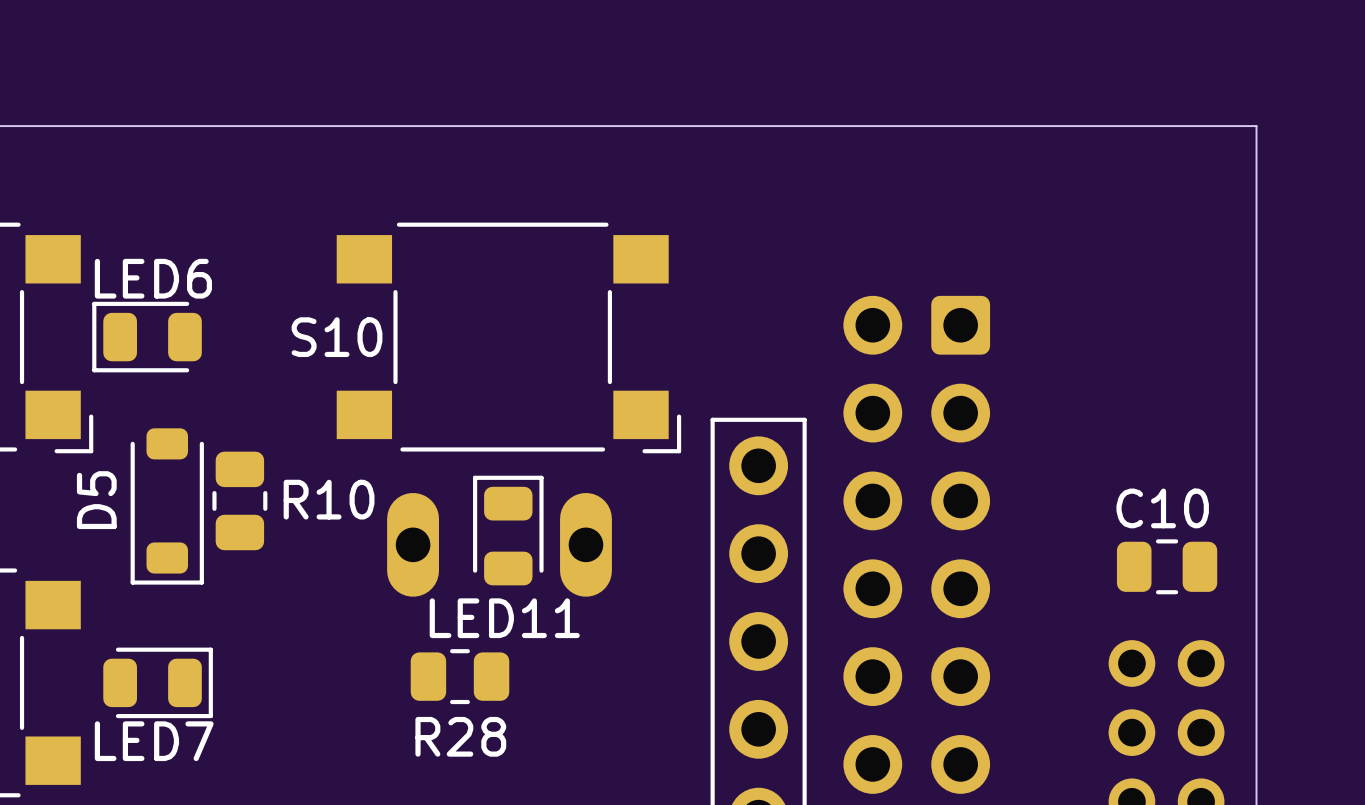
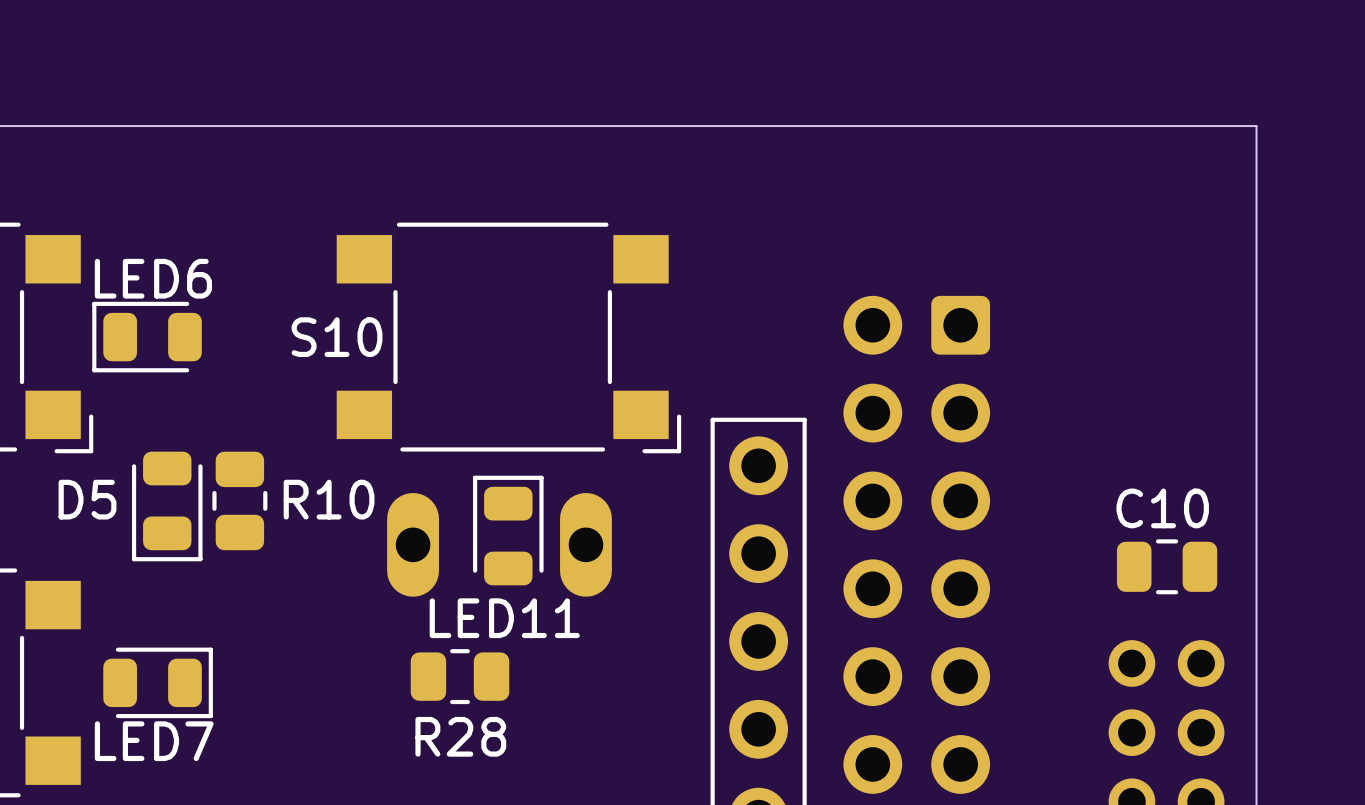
D5 footprint: [130, 428, 204, 585] -> [131, 451, 203, 562]
D5 name rotation: 0° (96, 500) -> 90° clockwise (87, 499)

